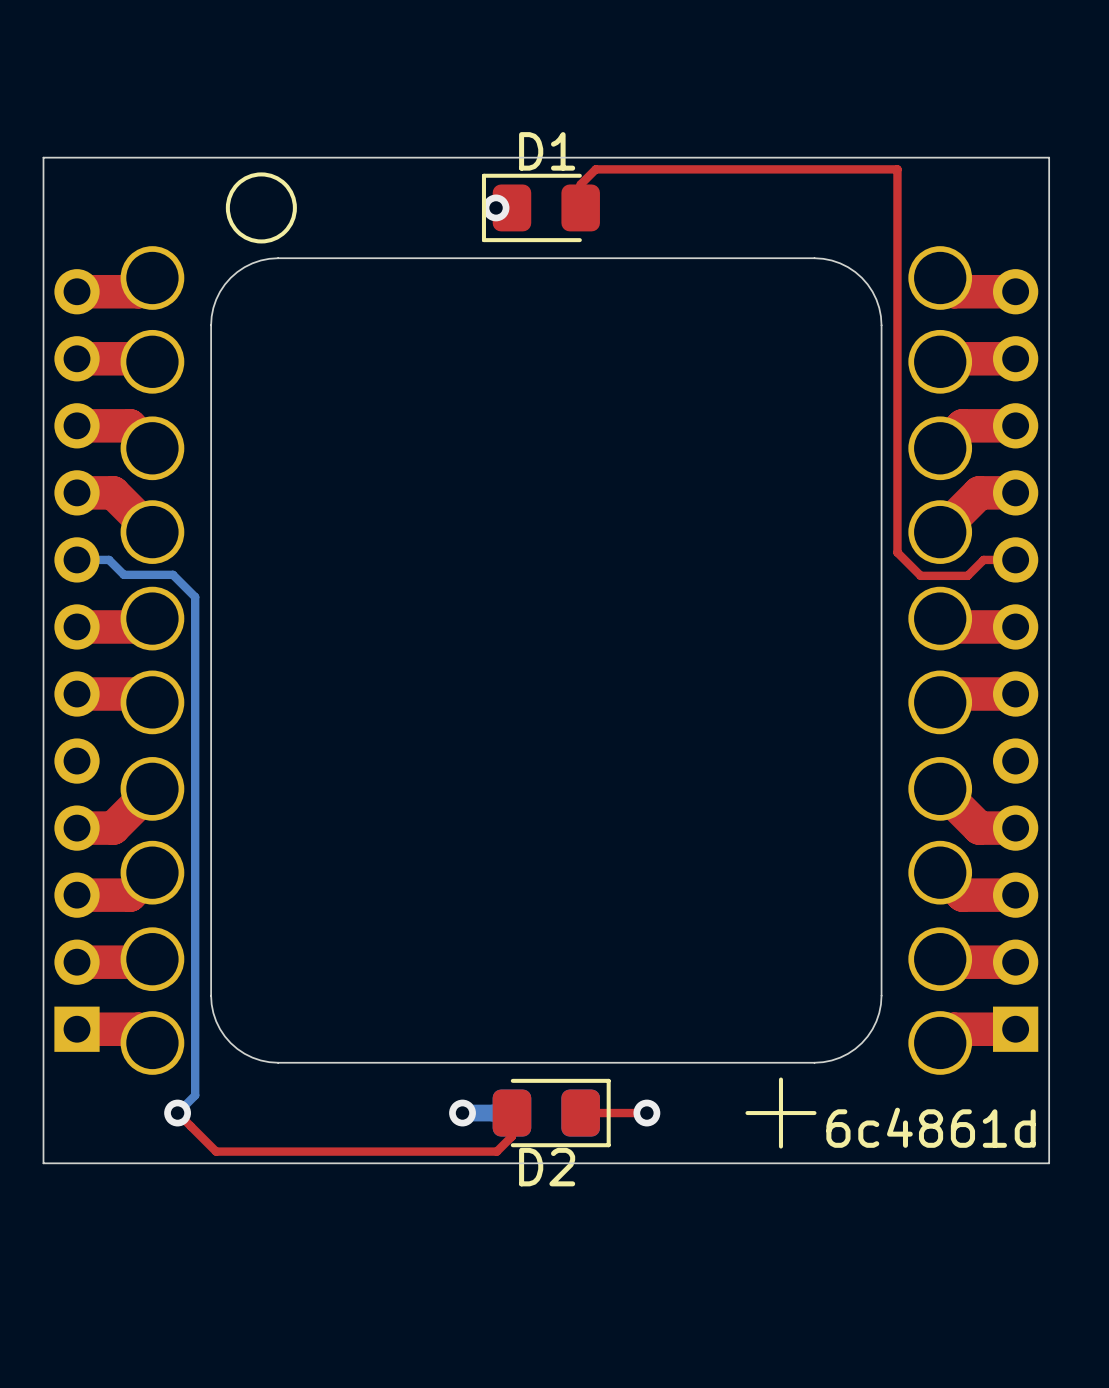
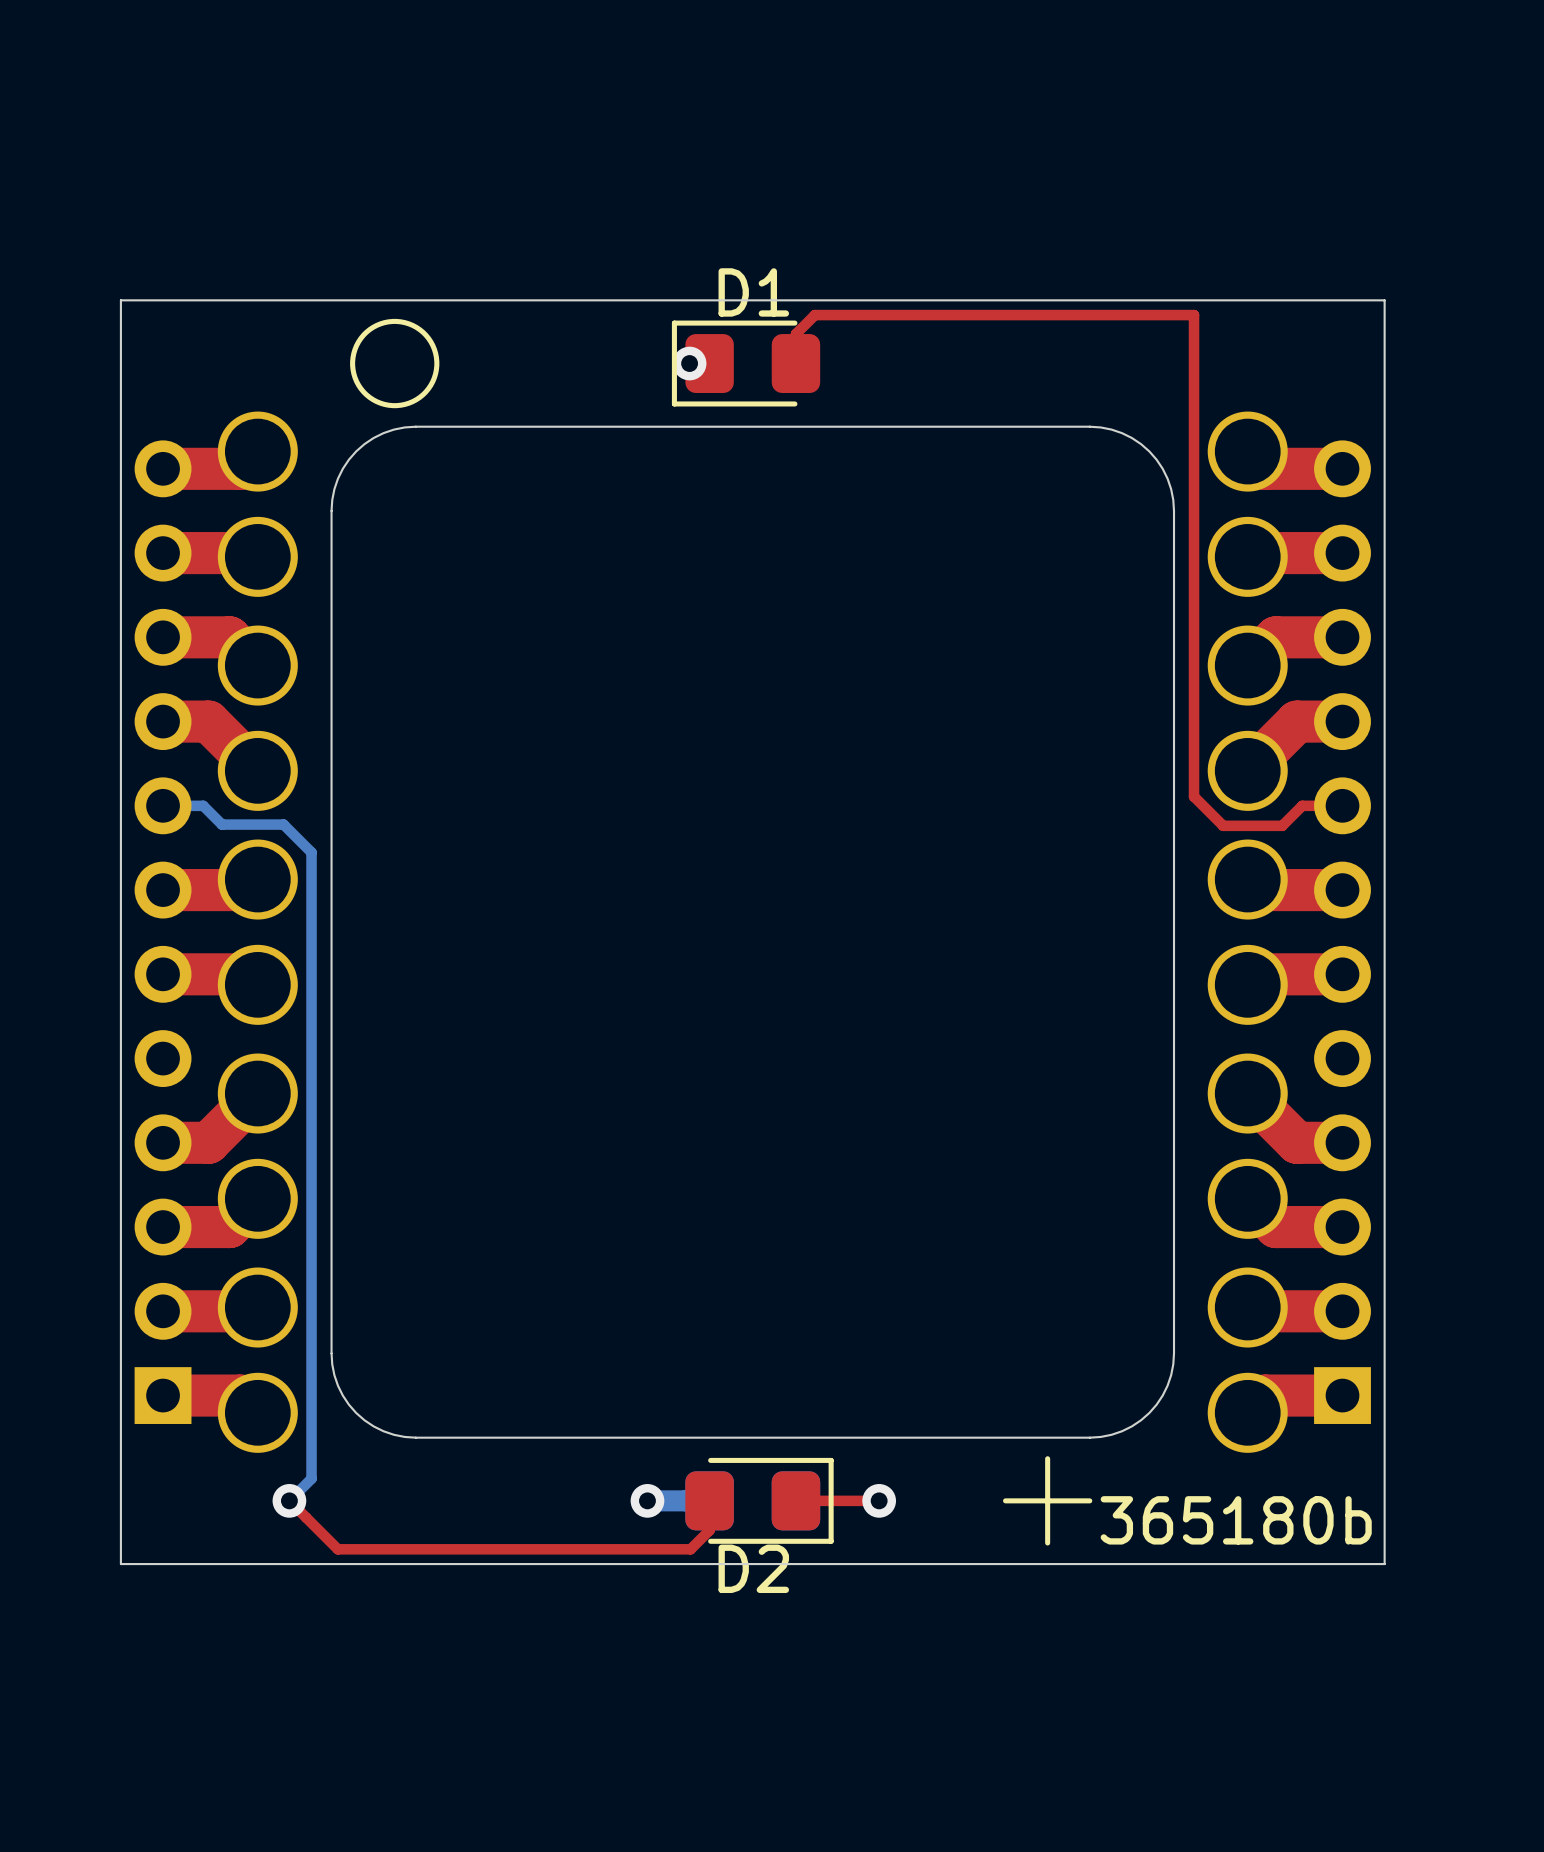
text: 6c4861d (931, 1127) -> 365180b (1236, 1520)

